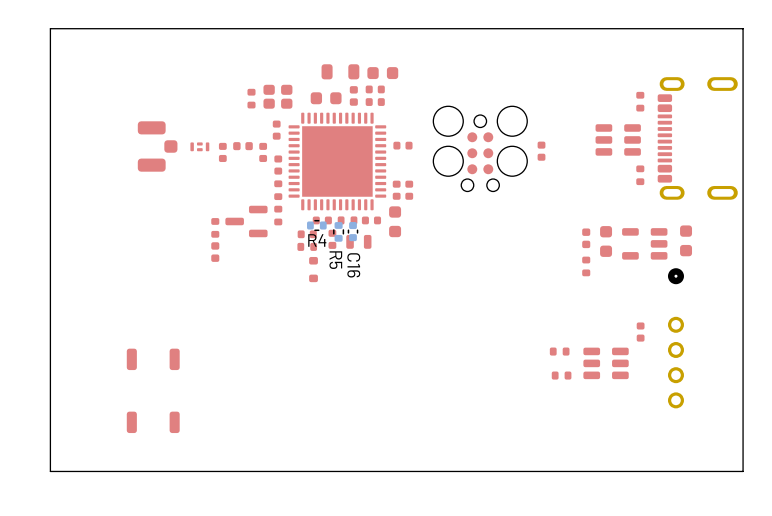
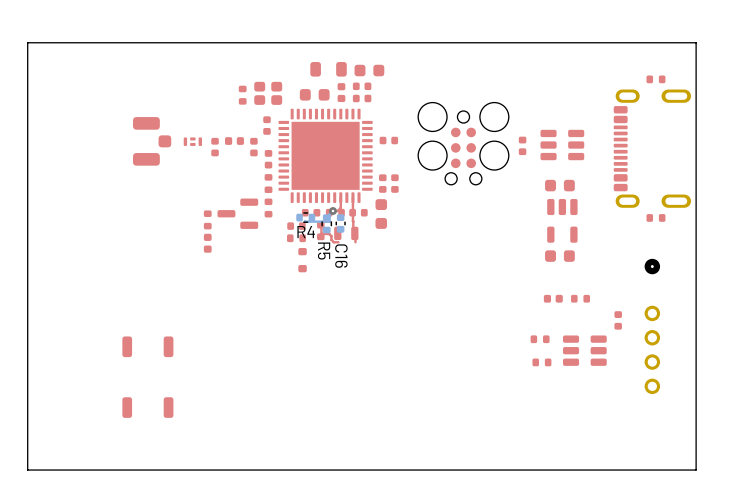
board edge: (743, 28) (50, 28) (50, 471) (743, 471) (743, 28) -> (696, 42) (27, 42) (27, 470) (696, 470) (696, 42)
part rotation: 0° (640, 101) -> 90° clockwise (655, 79)
part position: (640, 101) -> (655, 79)
part position: (697, 138) -> (652, 148)
part position: (618, 139) -> (562, 145)
part: (640, 175) -> none
top track: none -> (340, 197) (340, 207) (337, 211) (333, 211)
top track: none -> (352, 197) (355, 242)
bottom track: none -> (333, 211) (329, 214) (329, 221) (304, 221)
via: none -> (333, 211)
part: none -> (655, 217)
part footprint: [582, 228, 591, 249] -> [547, 198, 578, 243]
top track: none -> (329, 221) (324, 221) (321, 224) (321, 233) (329, 233) (333, 242) (338, 242)
part: (686, 240) -> none
part rotation: 0° (606, 241) -> 90° clockwise (559, 185)
part position: (606, 241) -> (559, 185)
part: (644, 243) -> none
part footprint: [582, 256, 591, 277] -> [545, 250, 575, 262]
part: none -> (553, 298)
part: none -> (580, 298)

